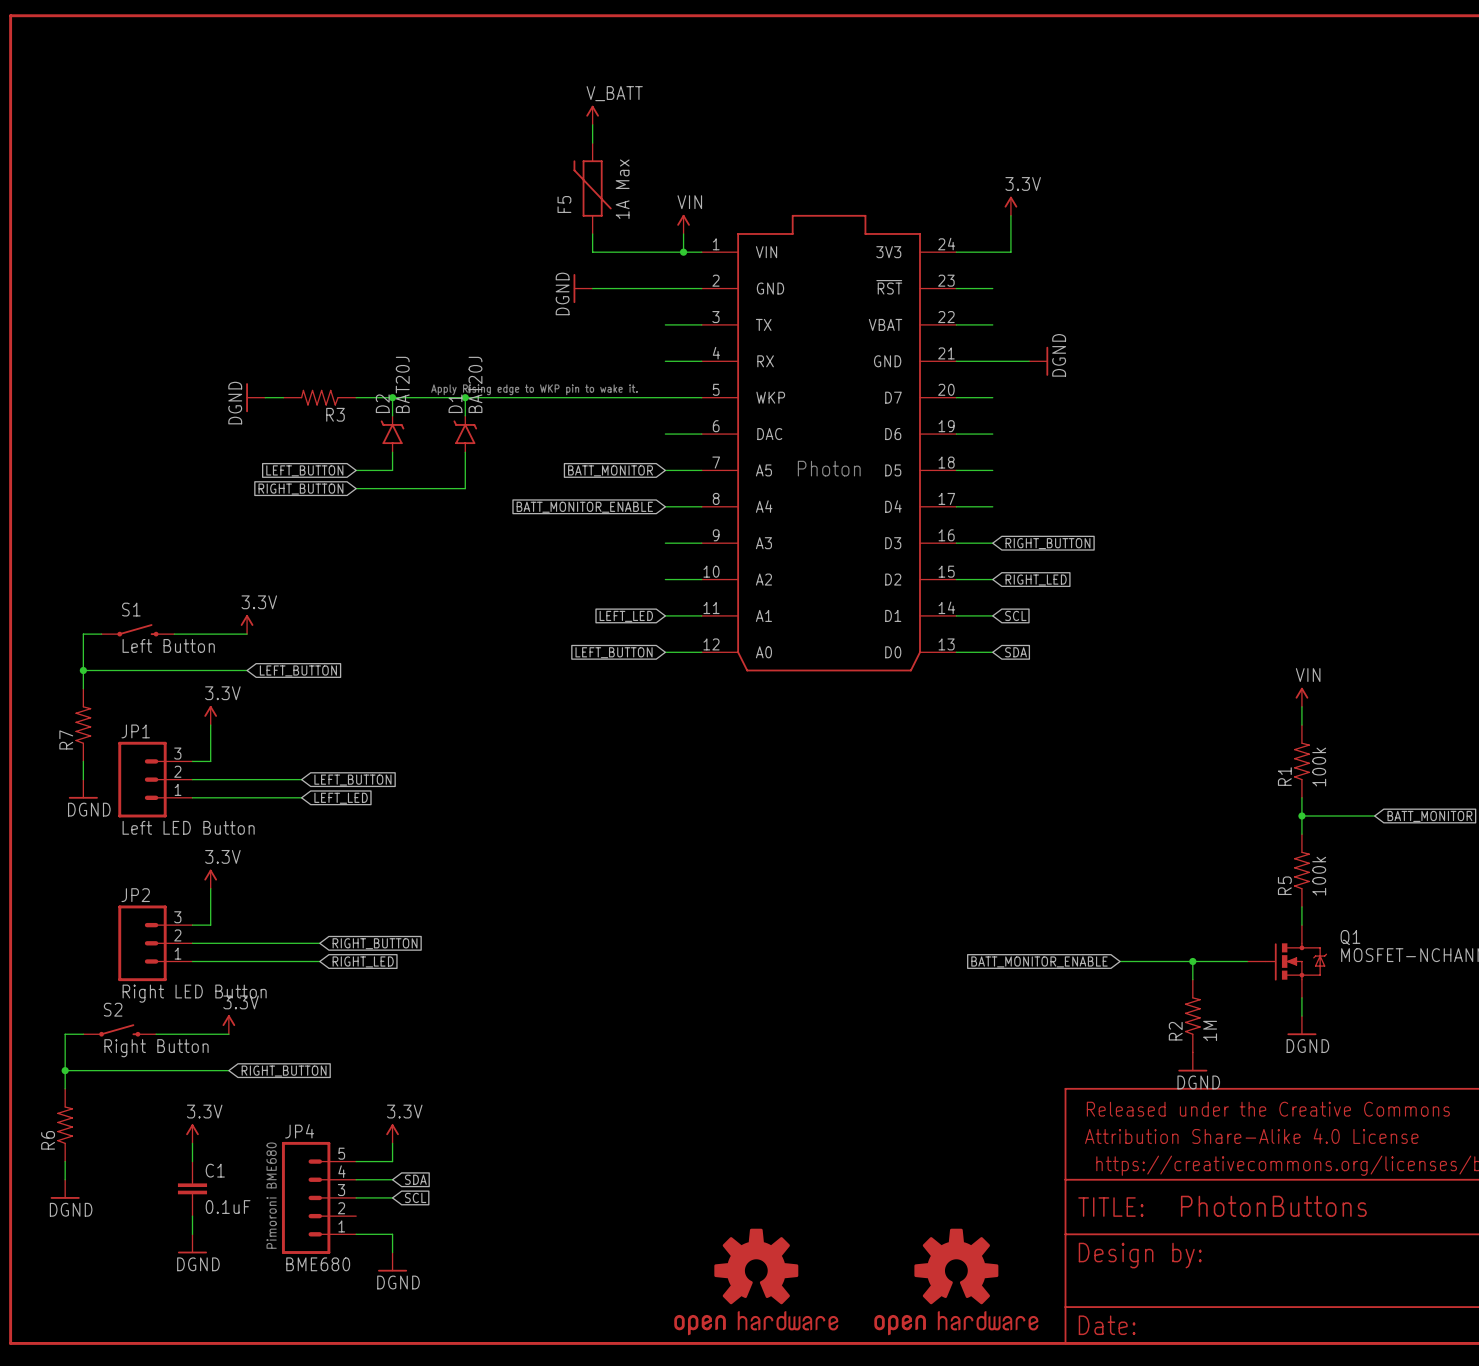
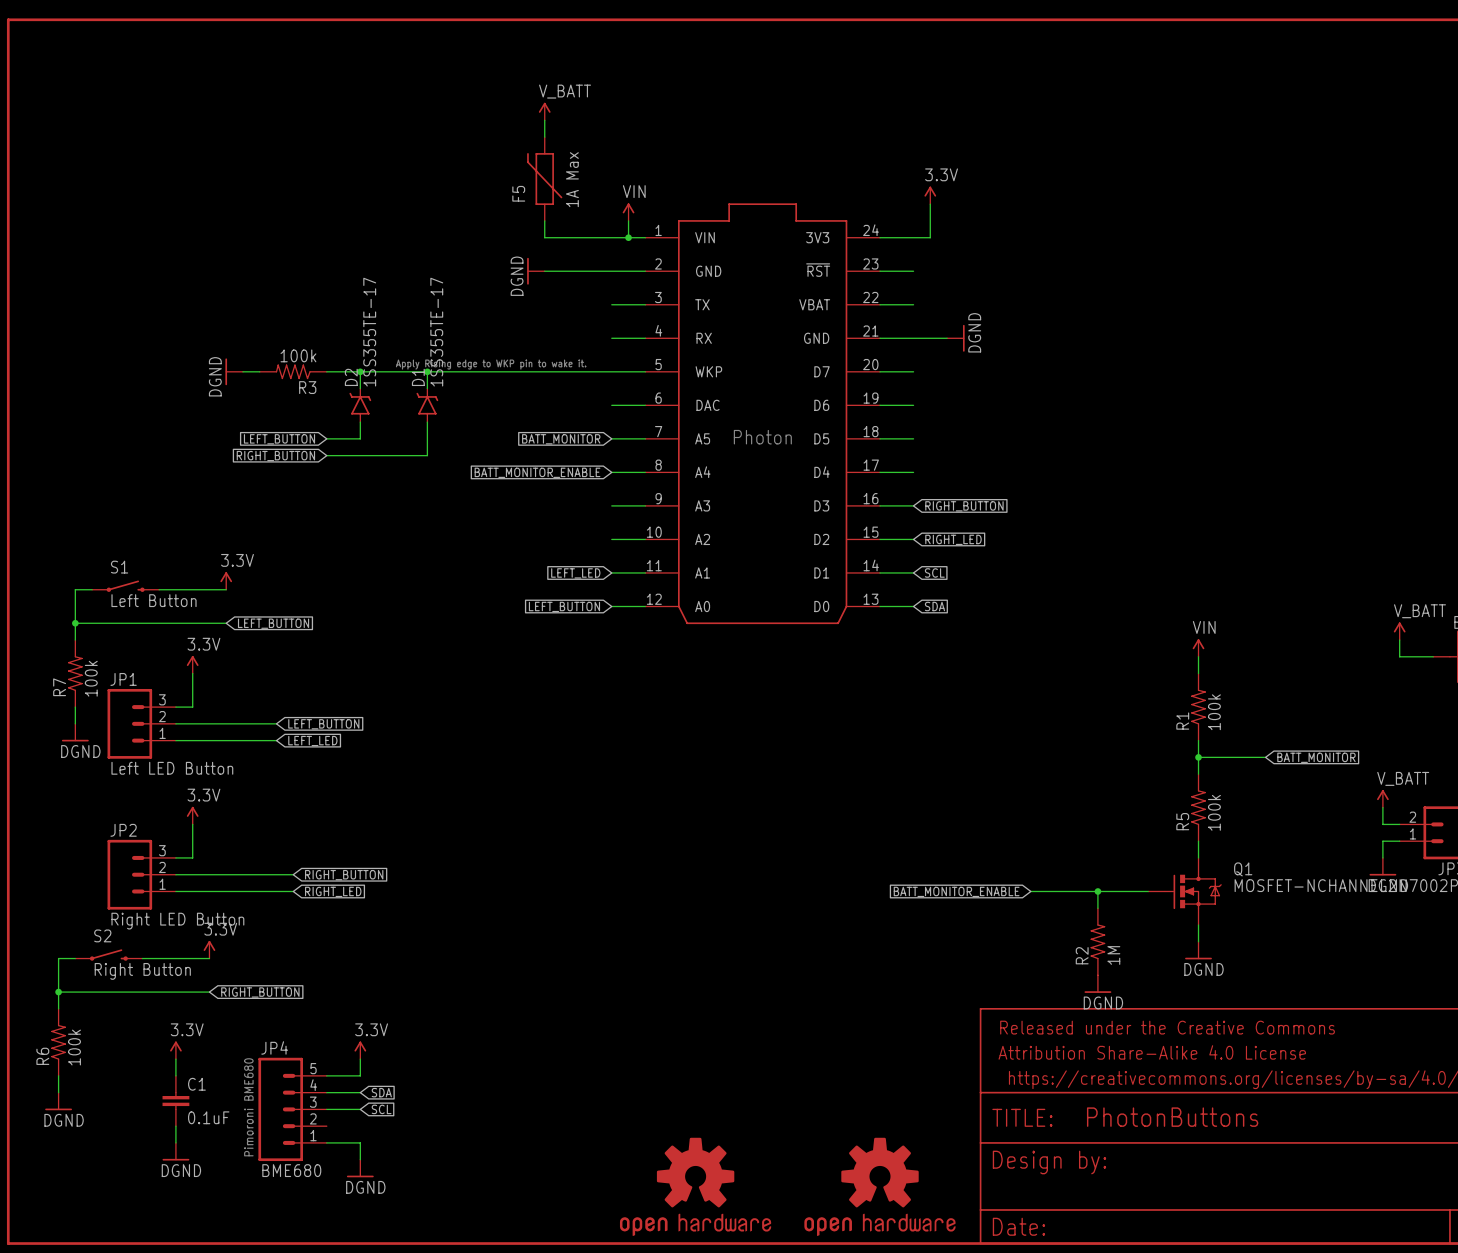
R3 value: none -> 100k (298, 355)
D2 value: BAT20J (402, 384) -> 1SS355TE-17 (369, 332)
D1 value: BAT20J (475, 384) -> 1SS355TE-17 (436, 332)
R7 value: none -> 100k (91, 678)
R6 value: none -> 100k (74, 1047)

